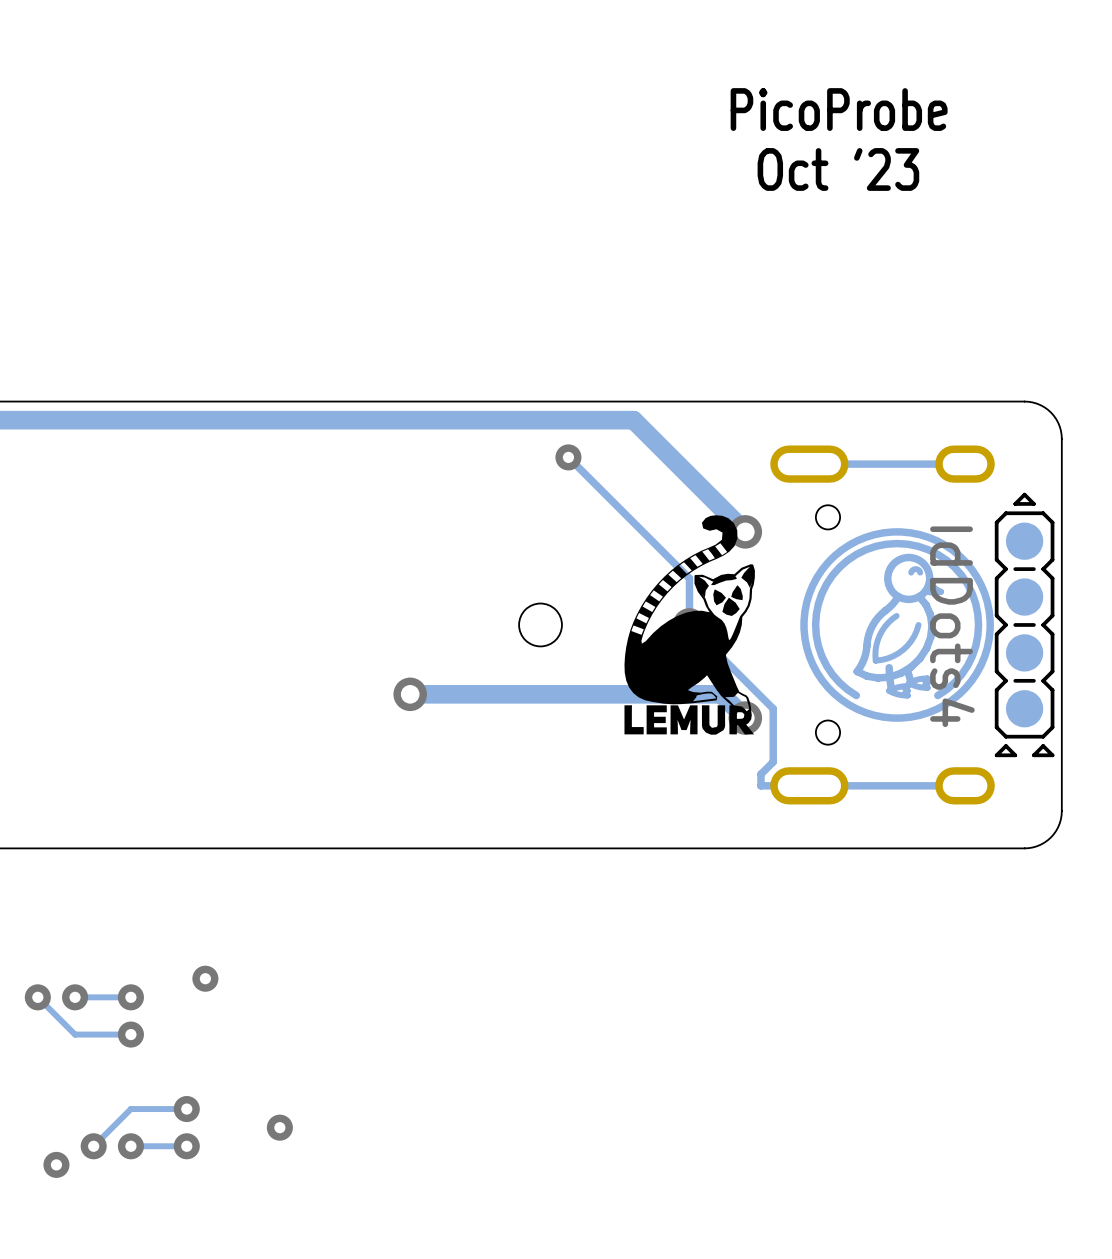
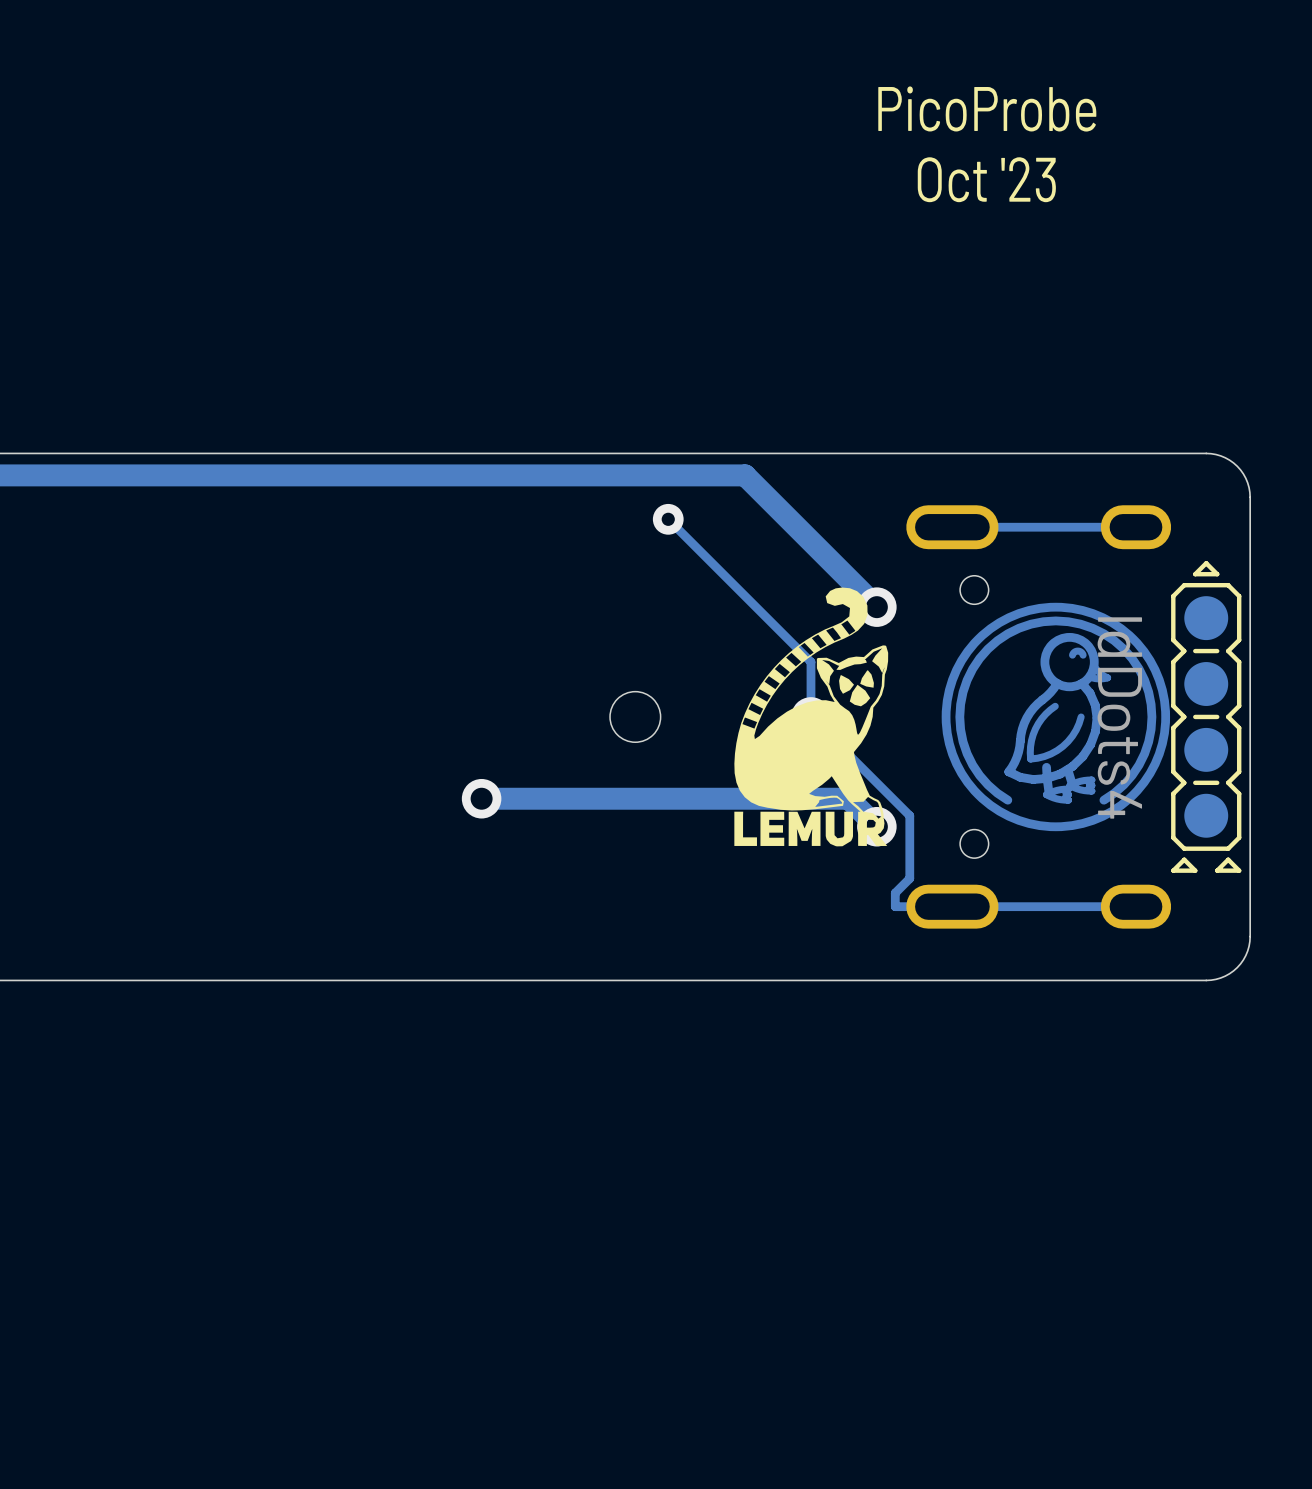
via: (205, 978) -> none
track: (37, 997) (75, 1034) (130, 1034) -> none
via: (37, 997) -> none
via: (75, 997) -> none
track: (130, 997) (75, 997) -> none
via: (130, 997) -> none
via: (130, 1034) -> none
track: (186, 1109) (130, 1109) (93, 1146) -> none
via: (186, 1109) -> none
via: (279, 1127) -> none
via: (93, 1146) -> none
via: (130, 1146) -> none
track: (186, 1146) (130, 1146) -> none
via: (186, 1146) -> none
via: (56, 1164) -> none

